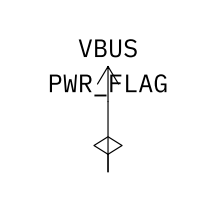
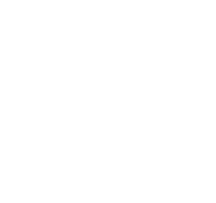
power symbol: VBUS (108, 84) -> none
wire: (108, 101) (108, 171) -> none
power symbol: PWR_FLAG (108, 154) -> none

